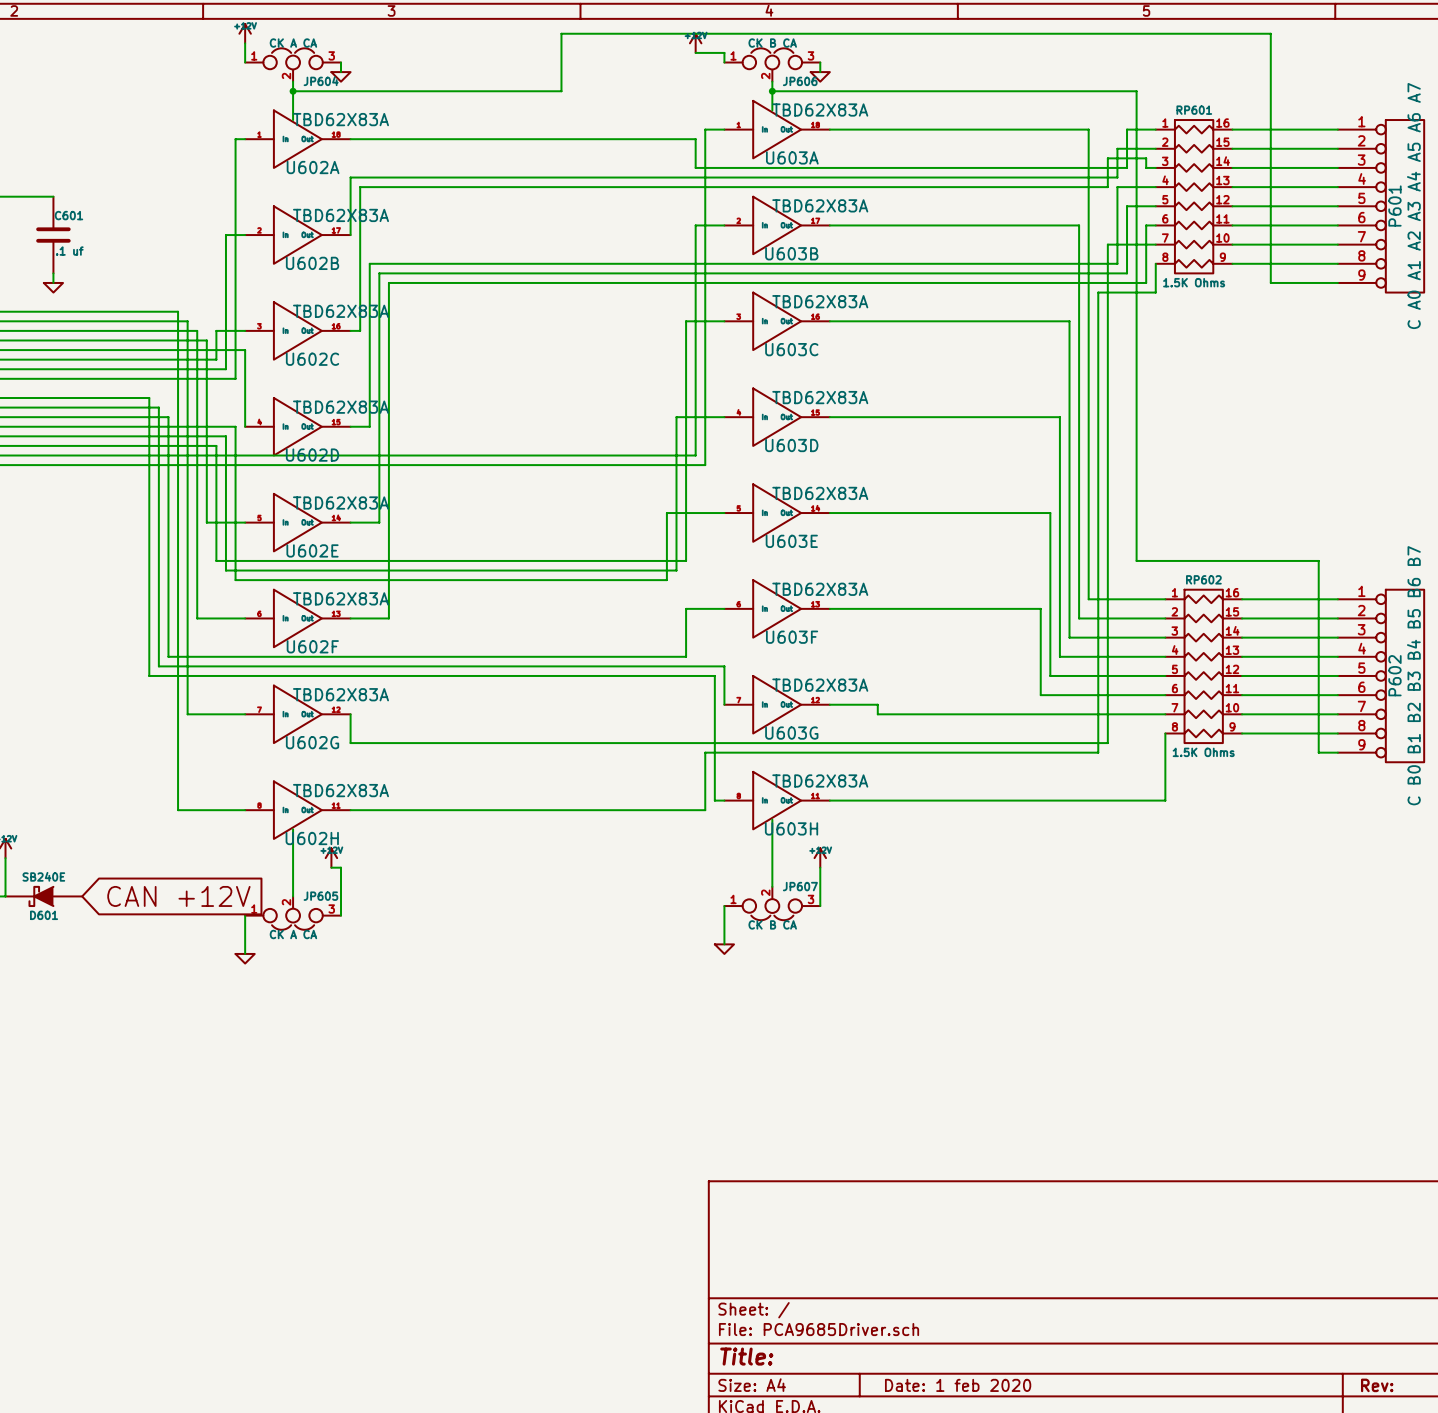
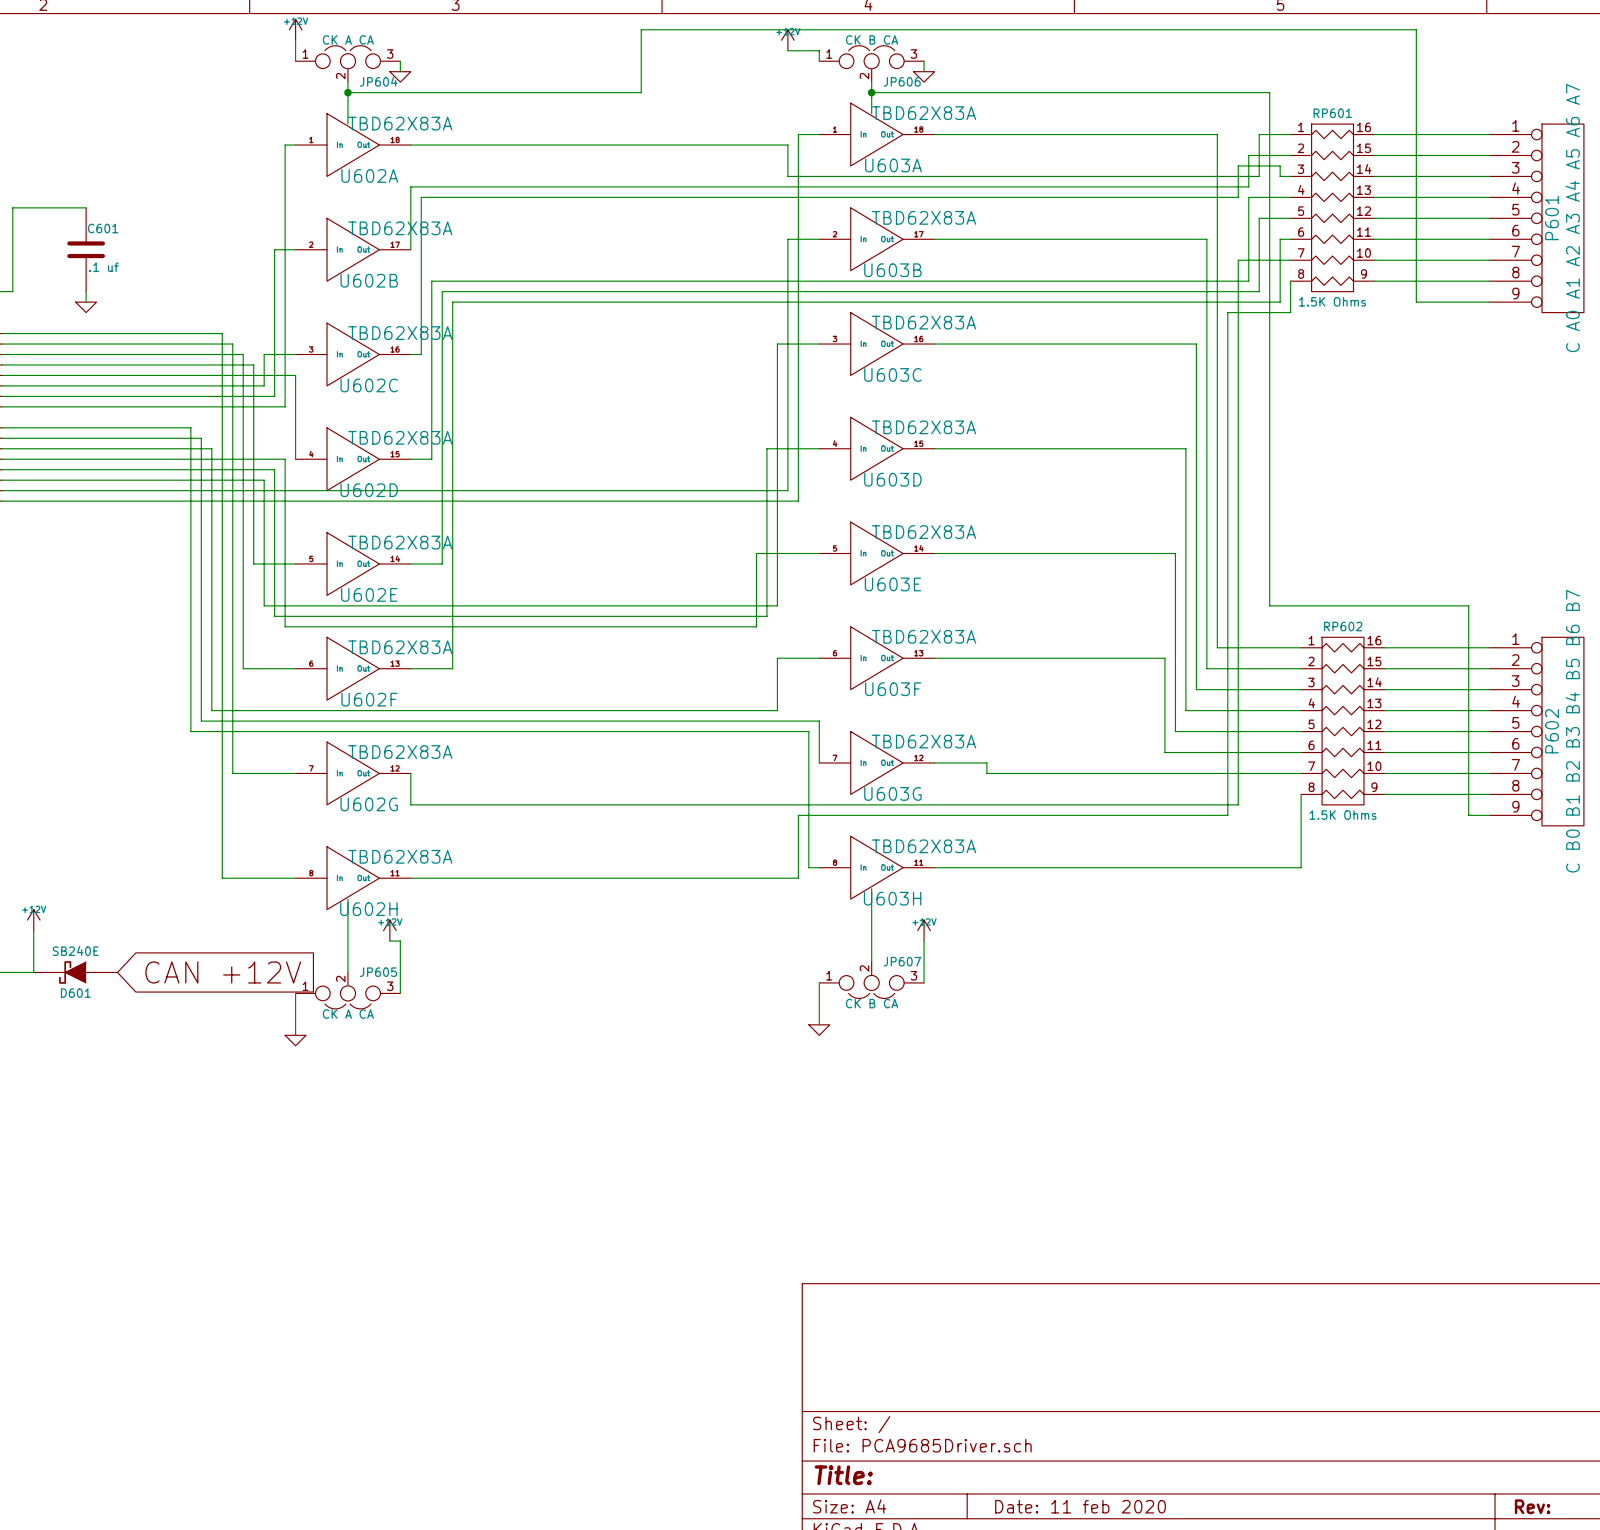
title block: Date: 1 feb 2020 (958, 1385) -> Date: 11 feb 2020 (1080, 1506)

